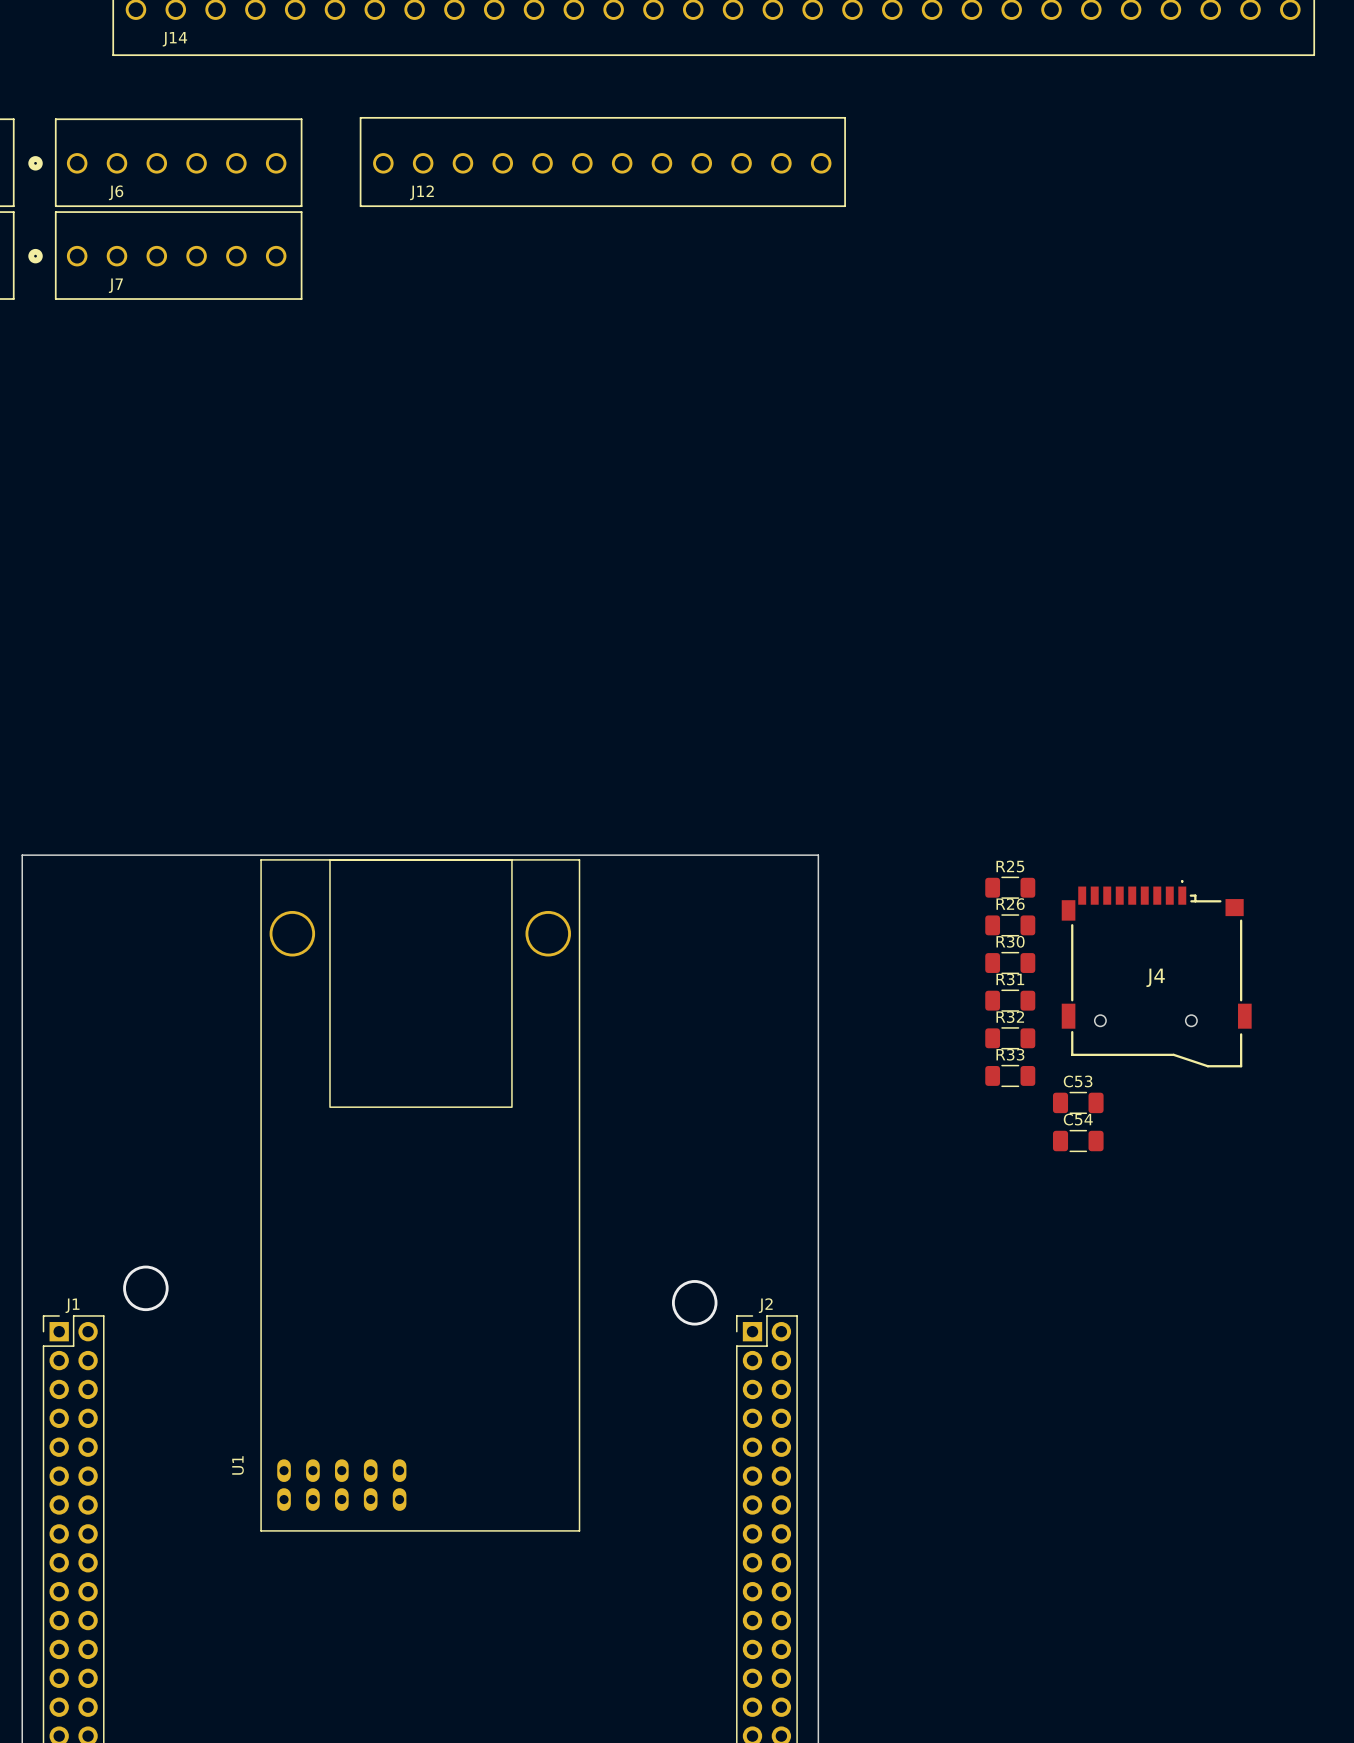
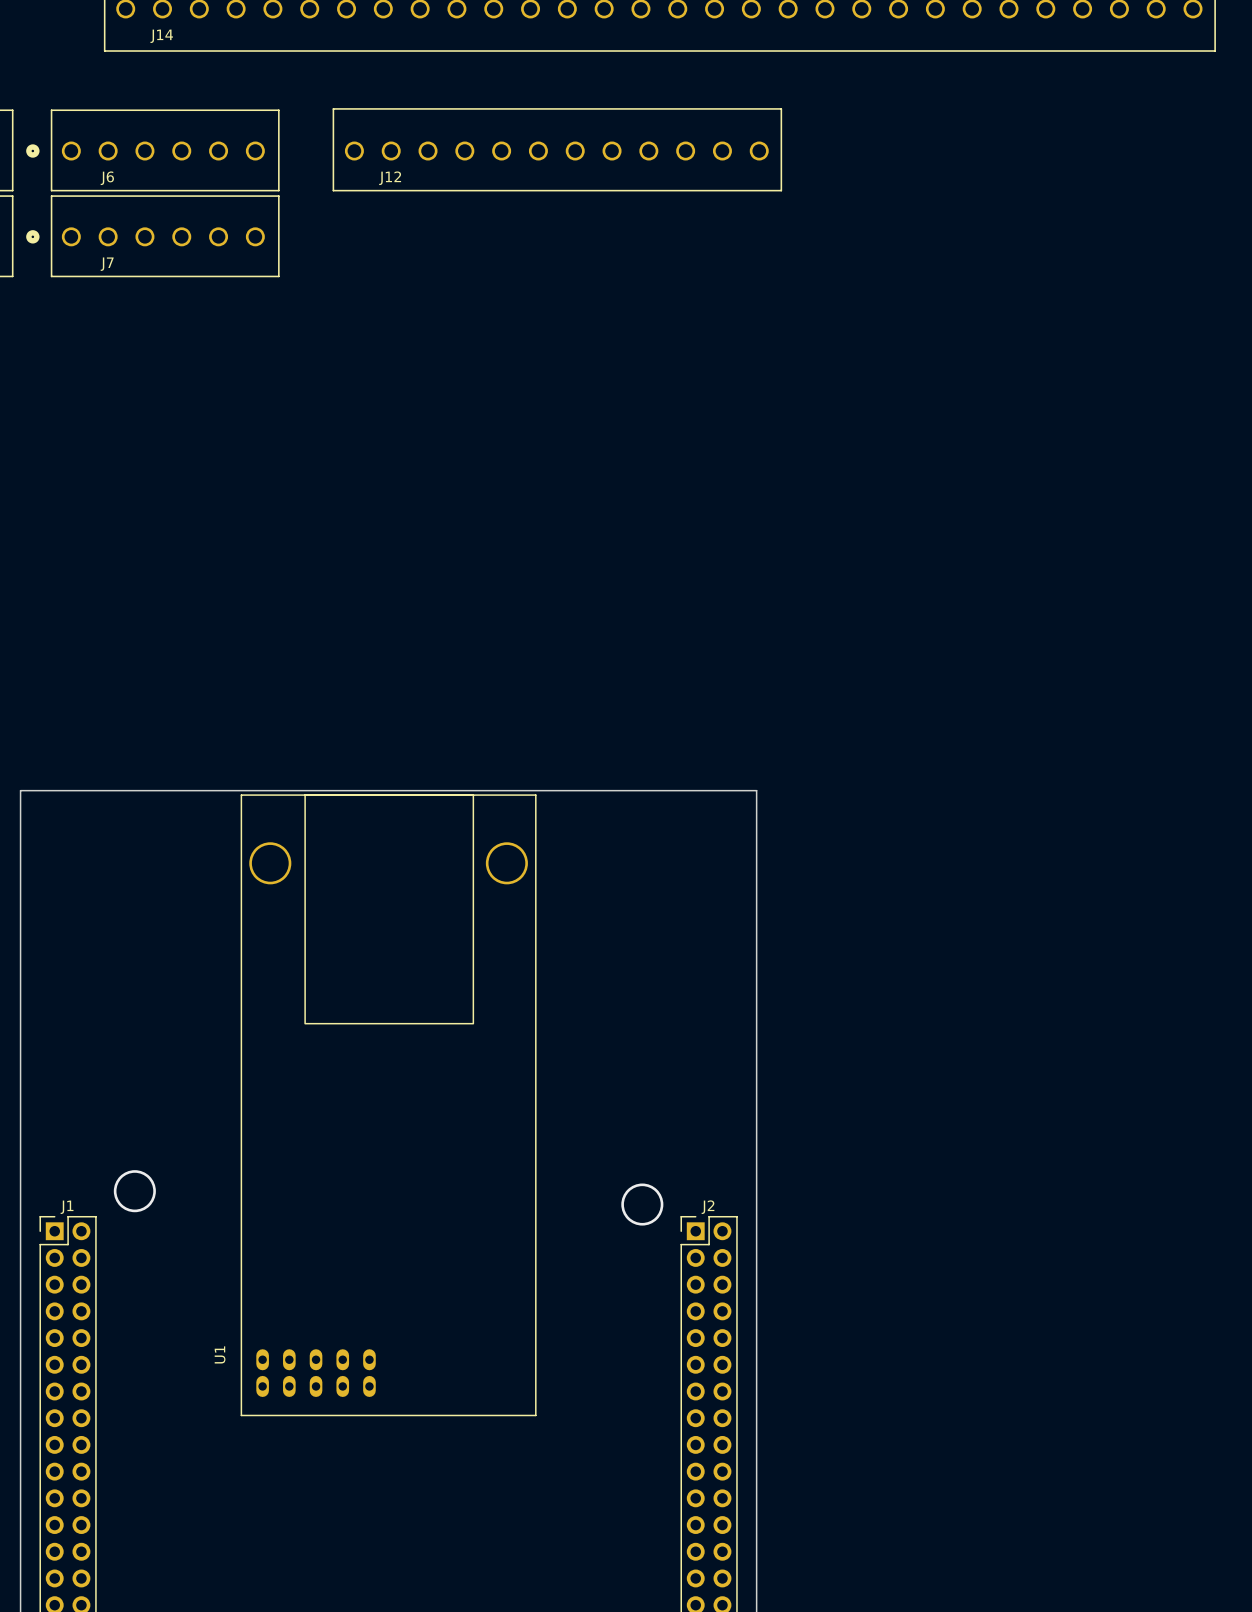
R25: (1010, 887) -> none
R26: (1010, 925) -> none
R30: (1010, 963) -> none
J4: (1156, 973) -> none
R31: (1010, 1000) -> none
R32: (1010, 1038) -> none
R33: (1010, 1075) -> none
C53: (1078, 1102) -> none
C54: (1078, 1141) -> none

